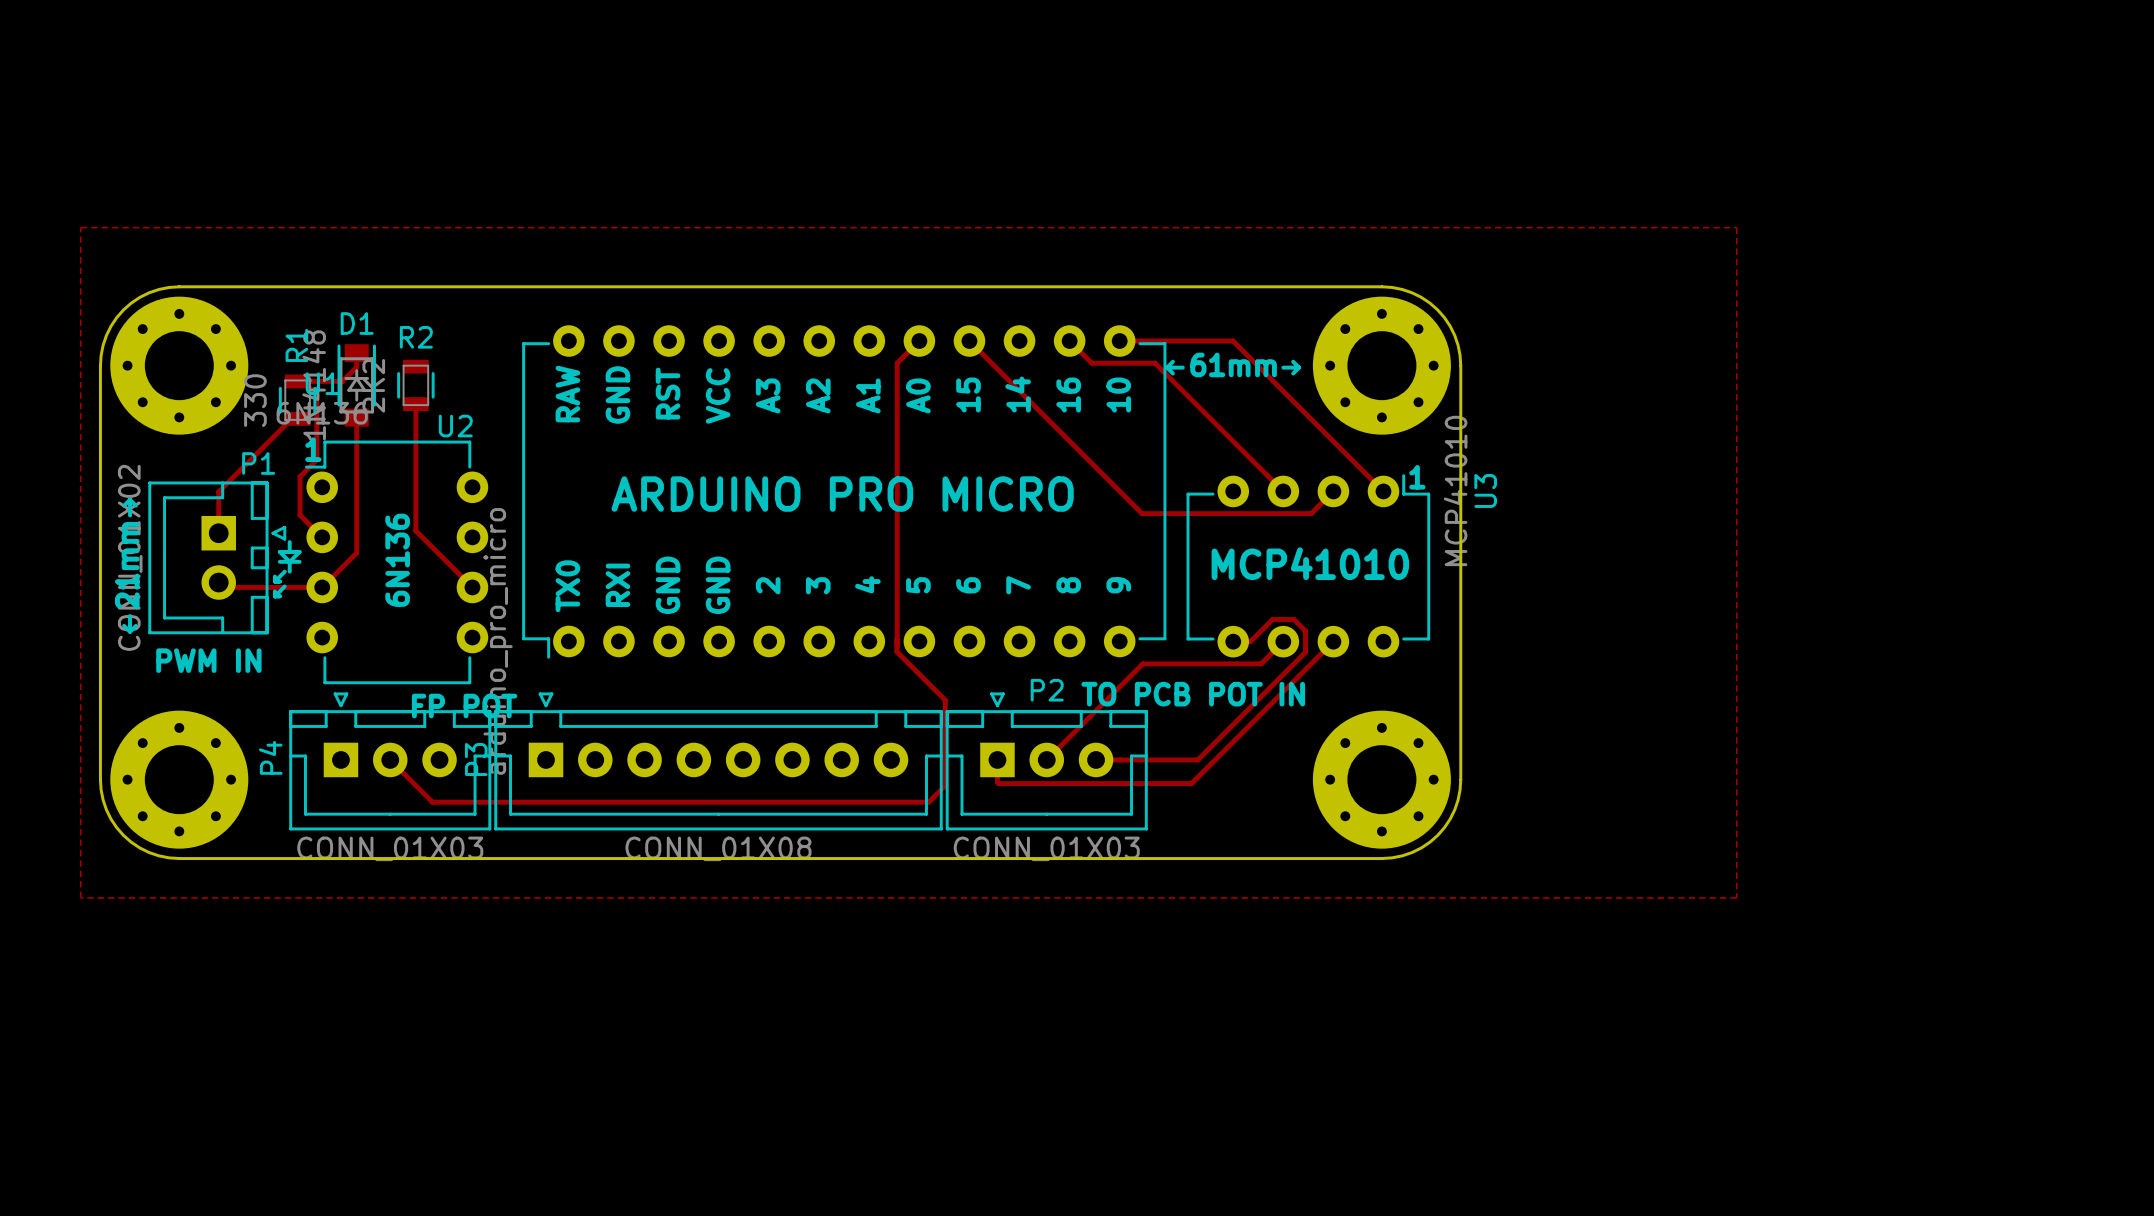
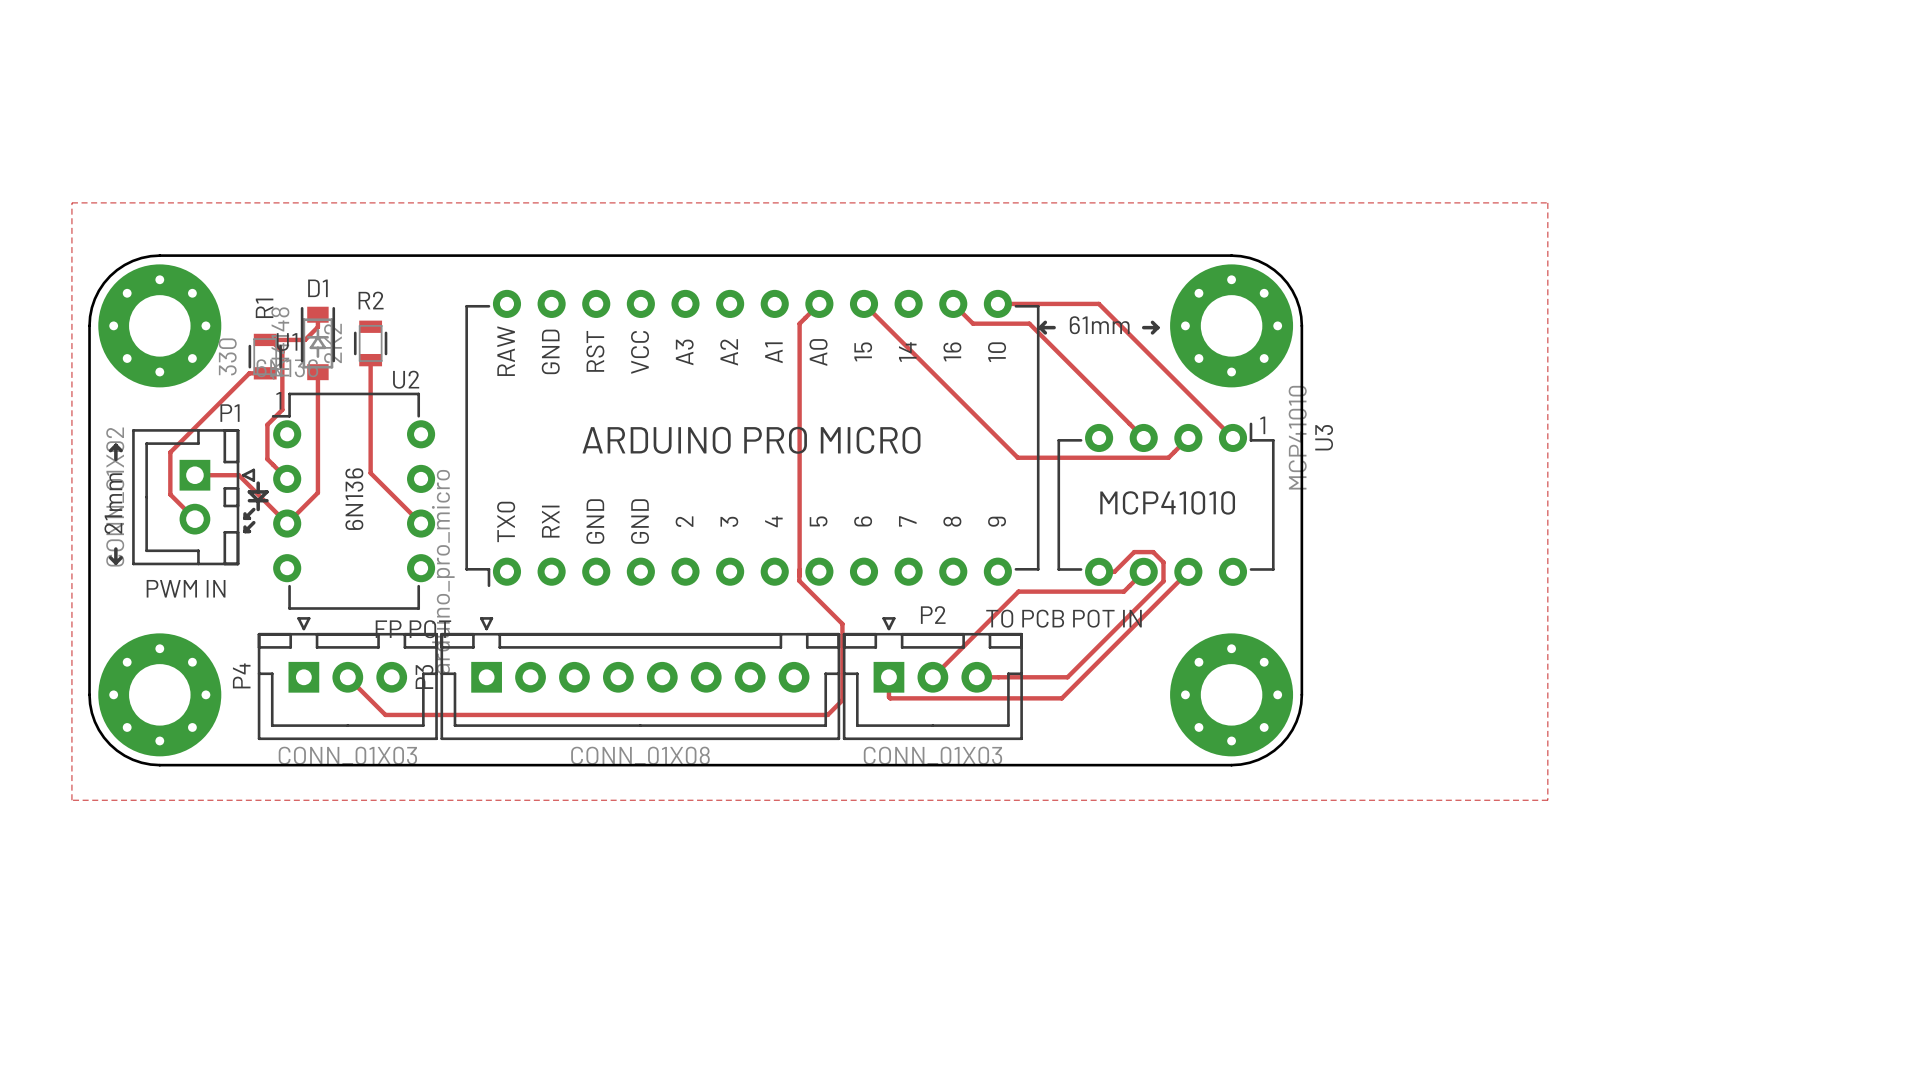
track: (291, 418) (218, 491) (218, 533) -> (259, 373) (249, 373) (170, 452) (170, 494) (194, 519)
track: (223, 587) (322, 587) -> (194, 475) (238, 475) (287, 523)

